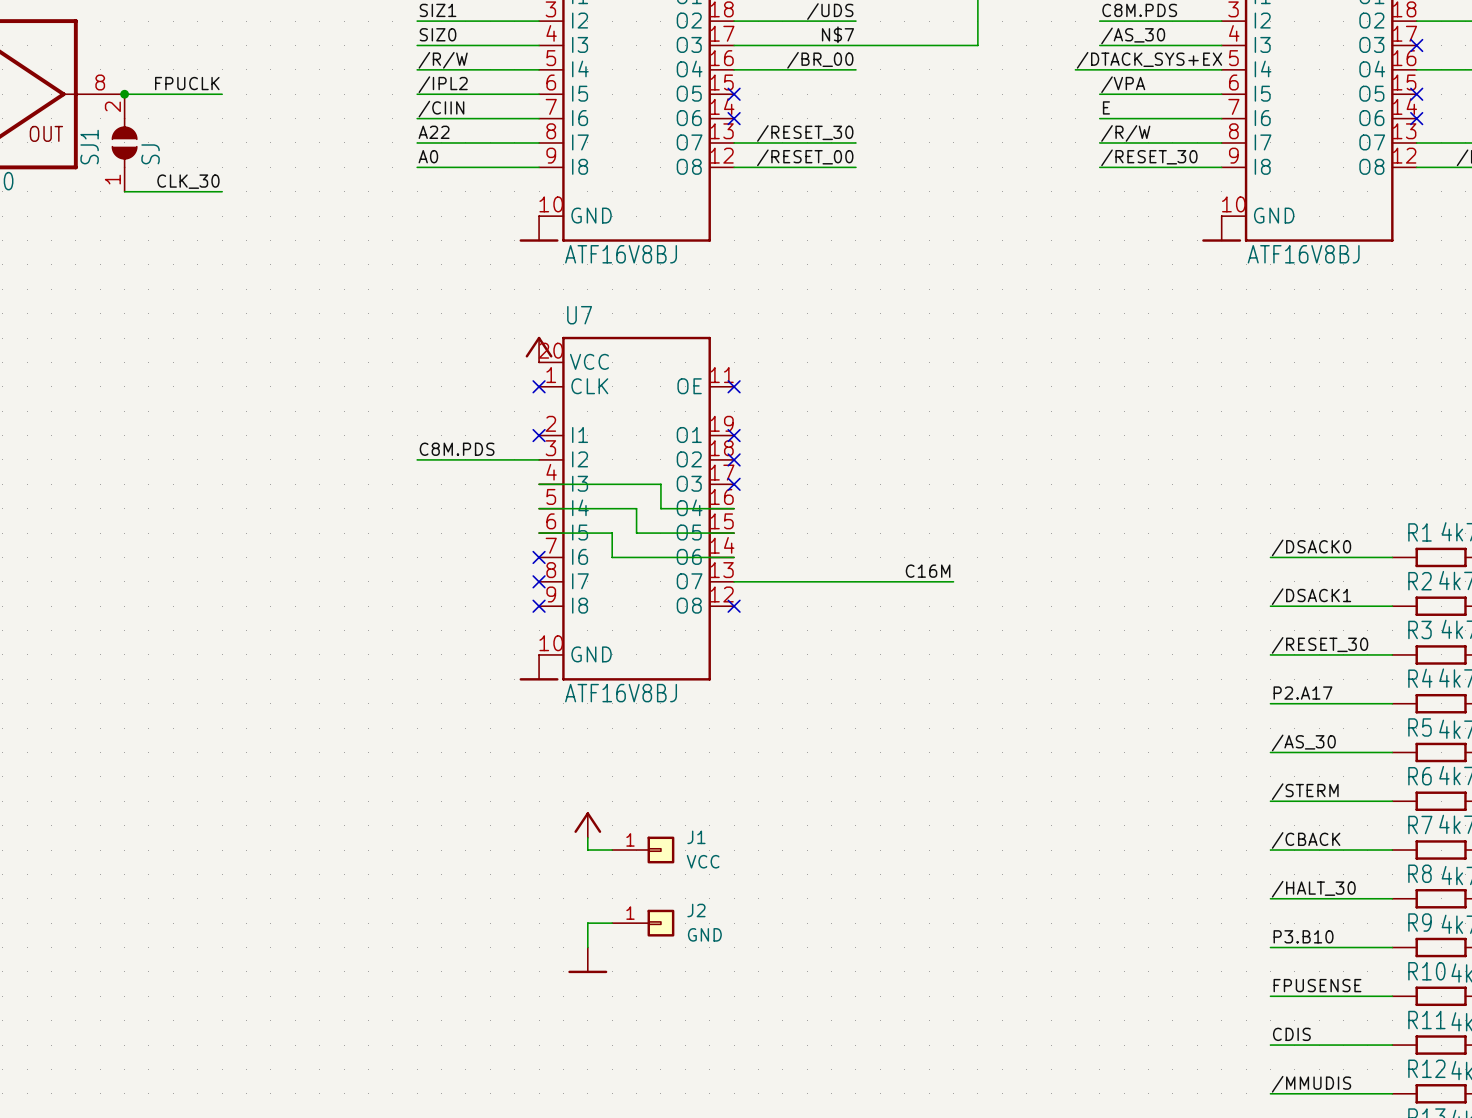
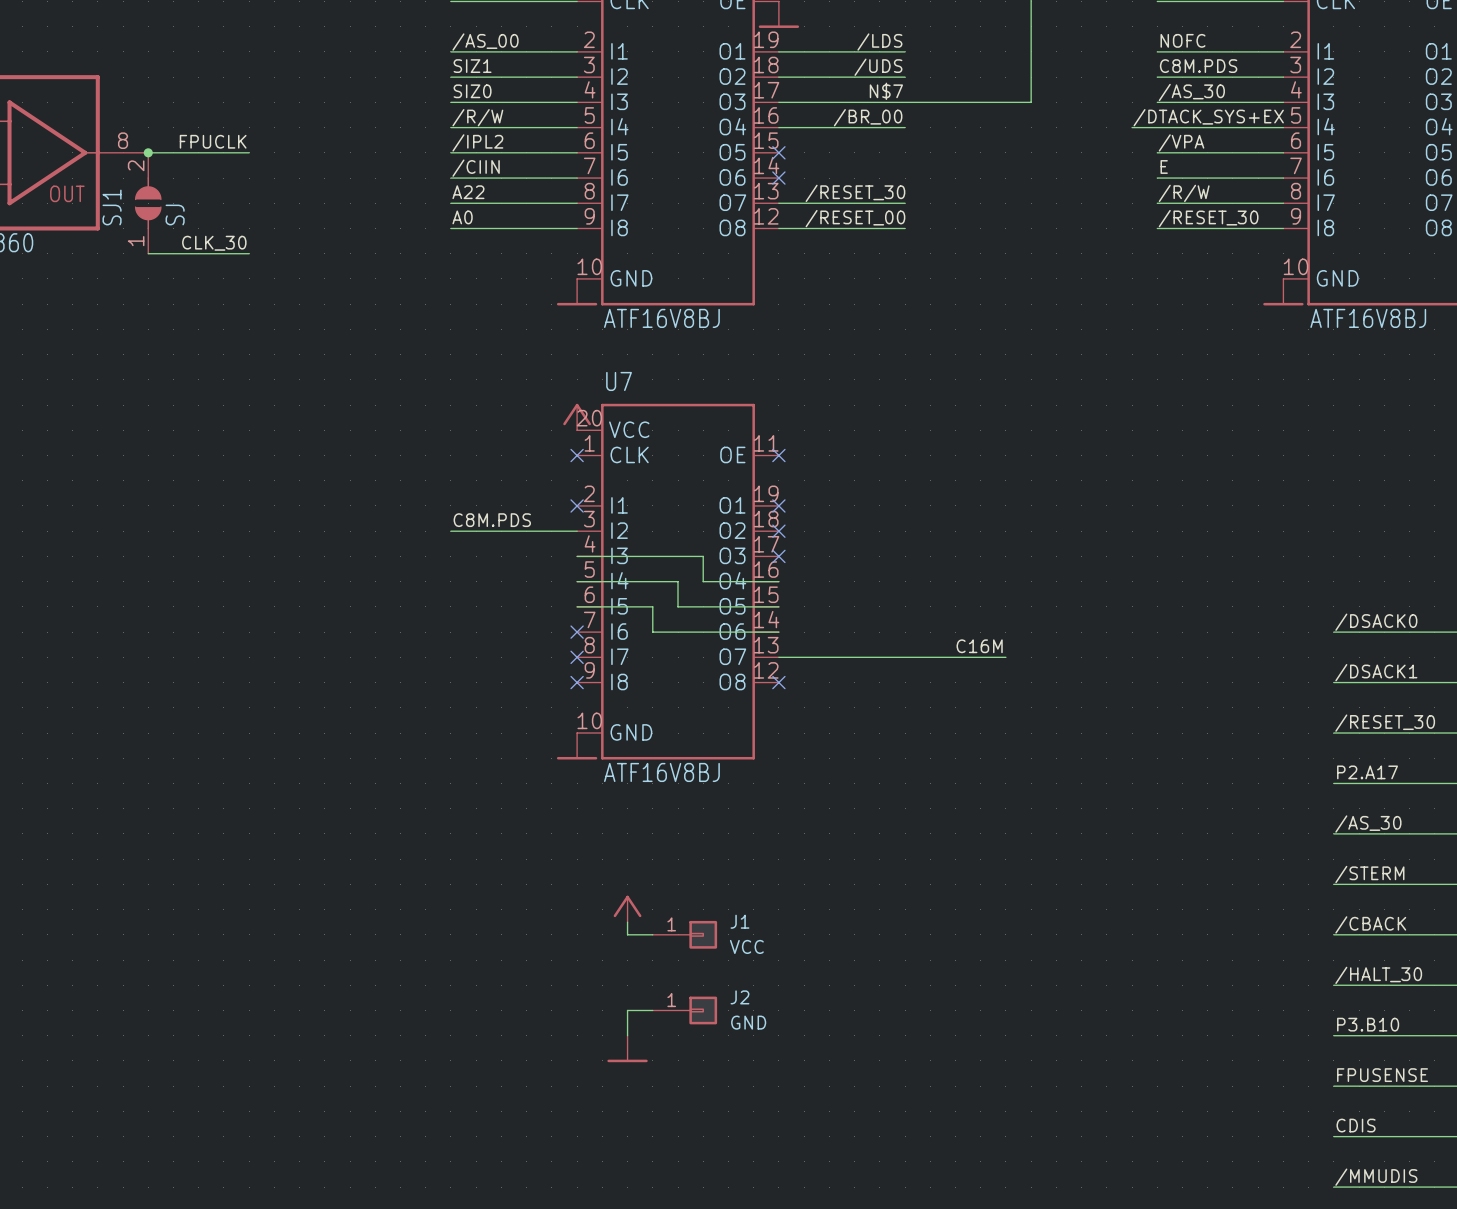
label position: /RESET_30 (805, 133) -> /RESET_30 (855, 193)
label position: /RESET_00 (805, 157) -> /RESET_00 (855, 218)

